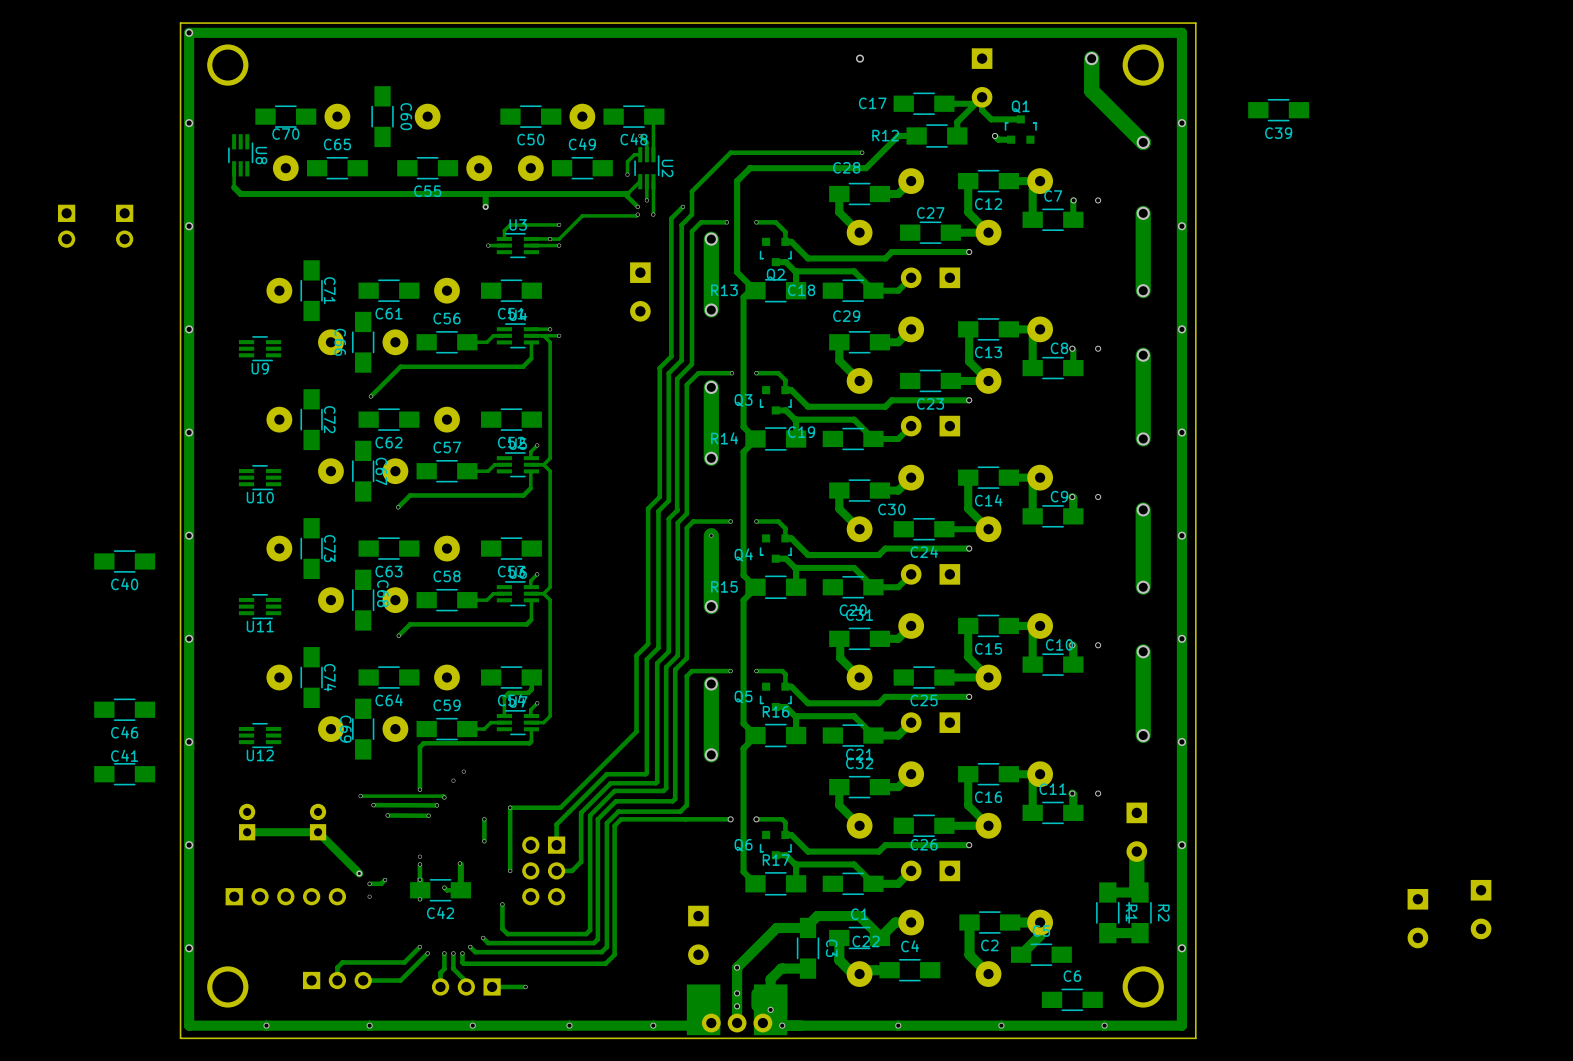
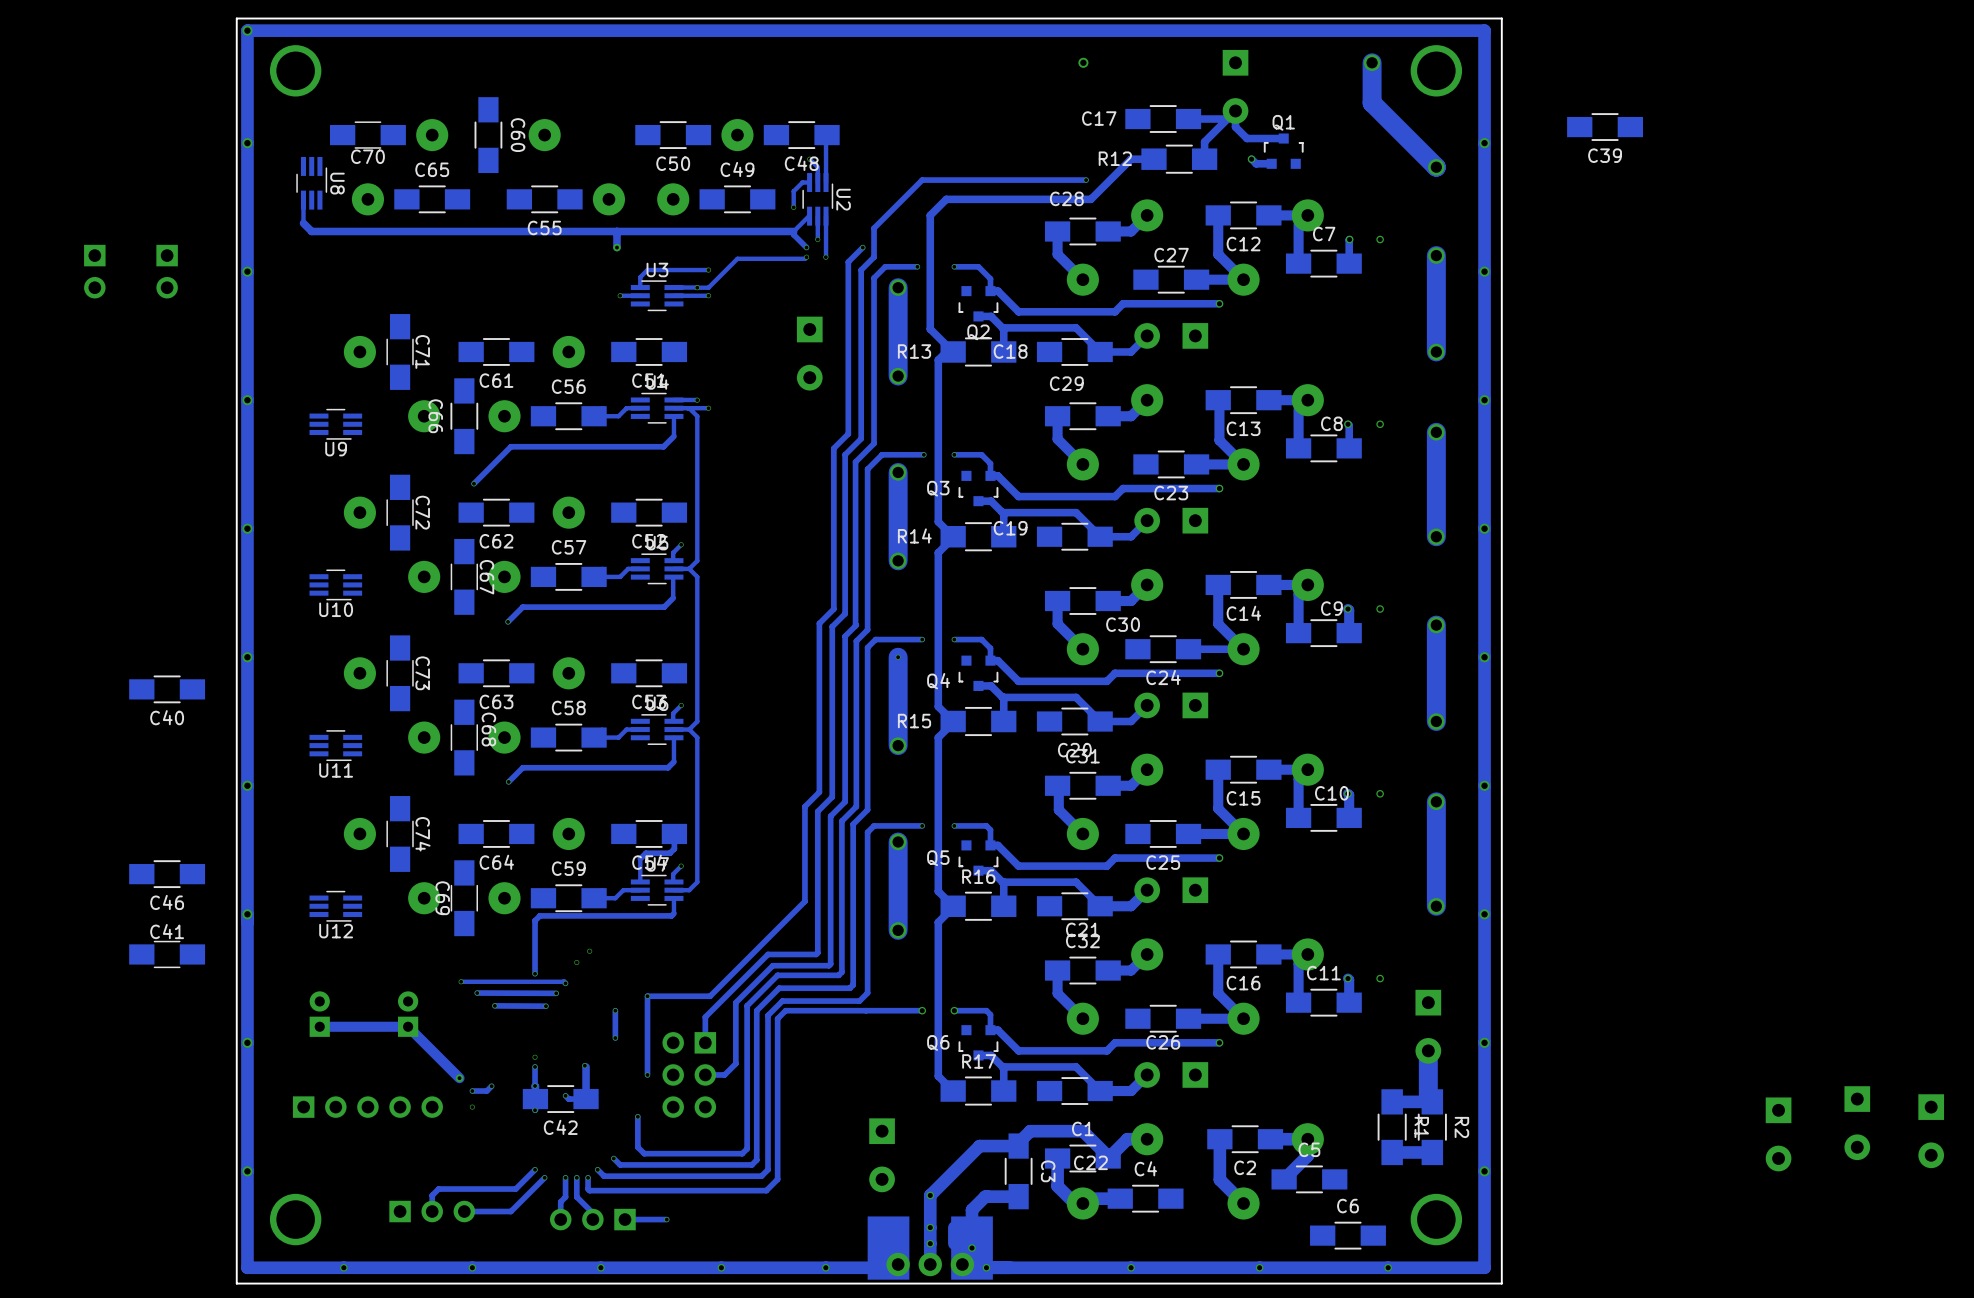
part: none -> (1931, 1131)

